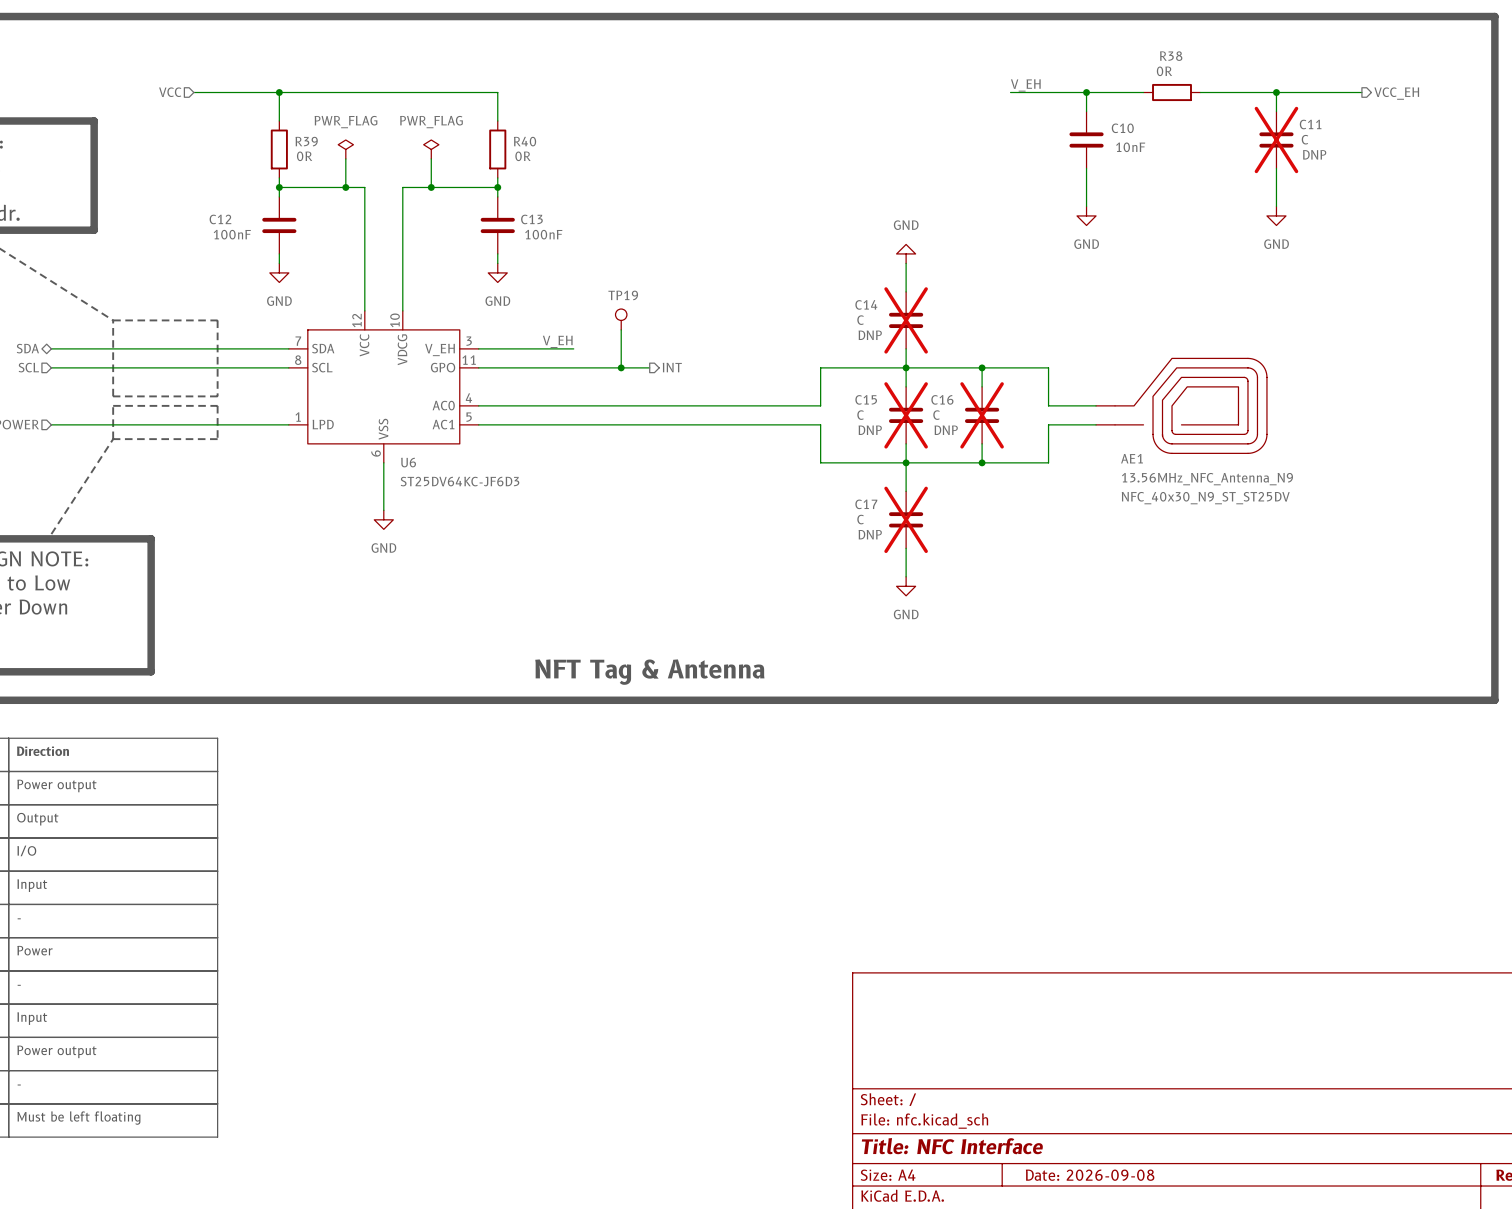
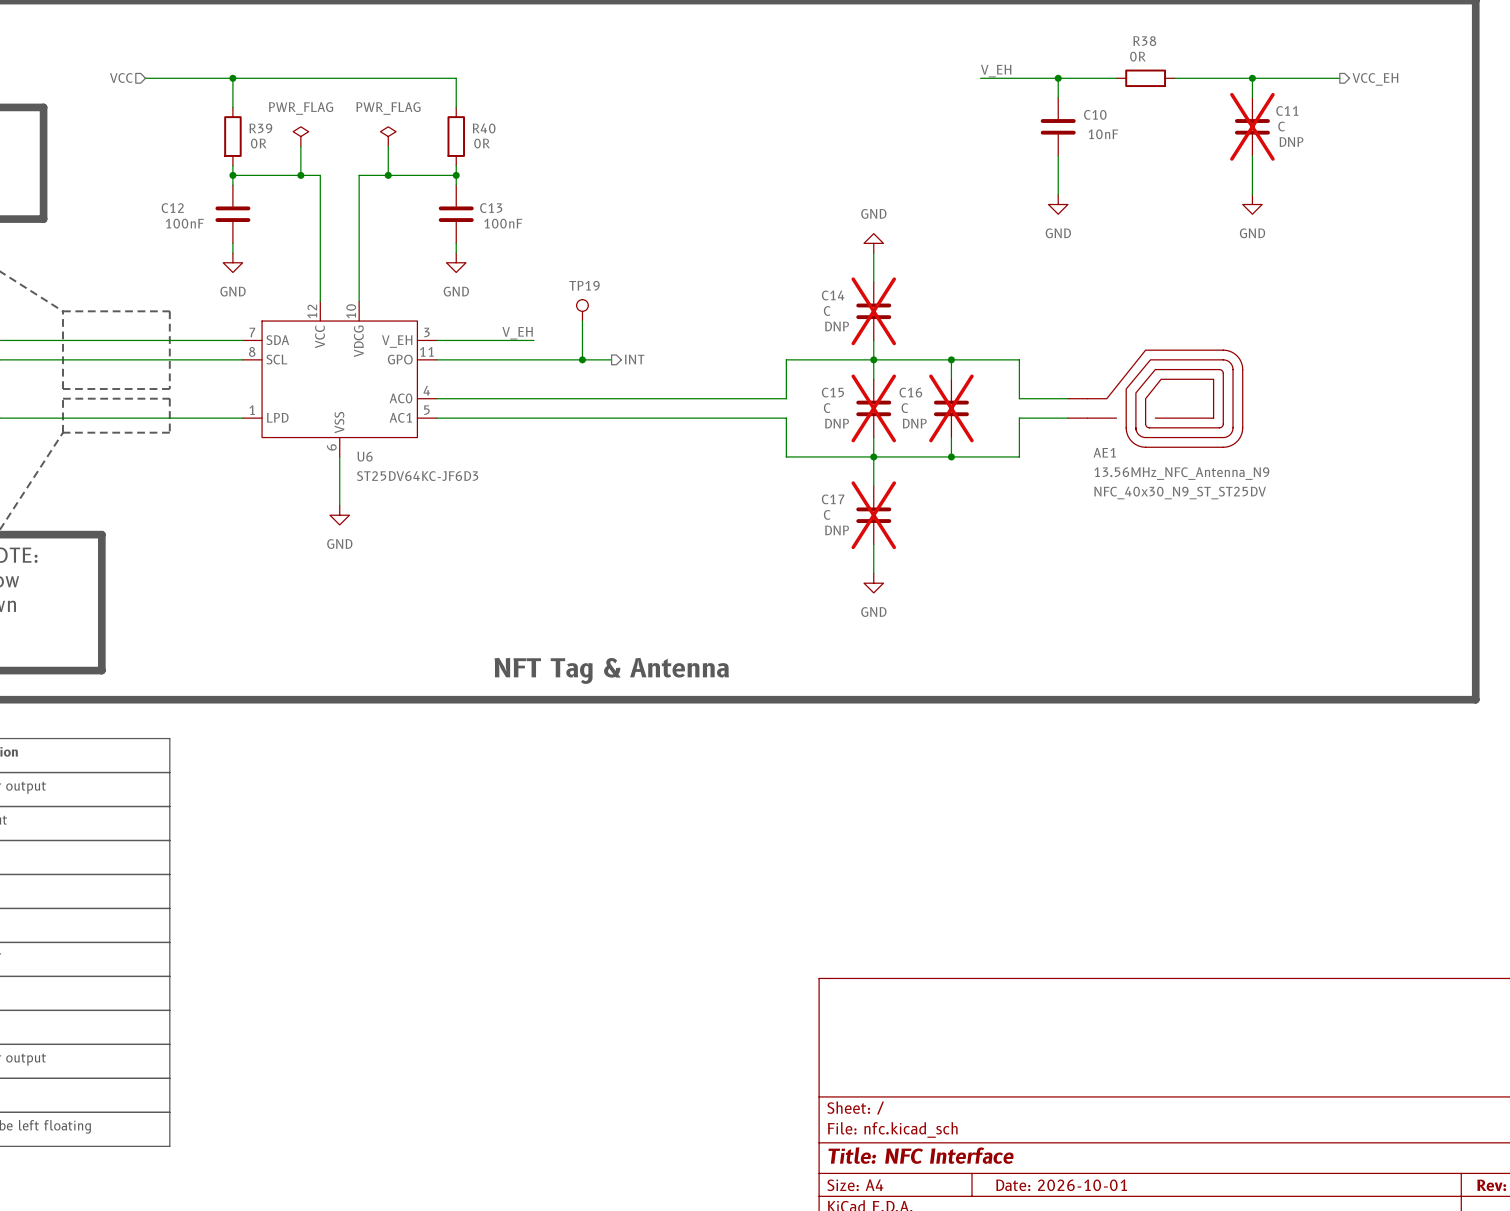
title block: Date: 2026-09-08 (1090, 1175) -> Date: 2026-10-01 (1061, 1185)

